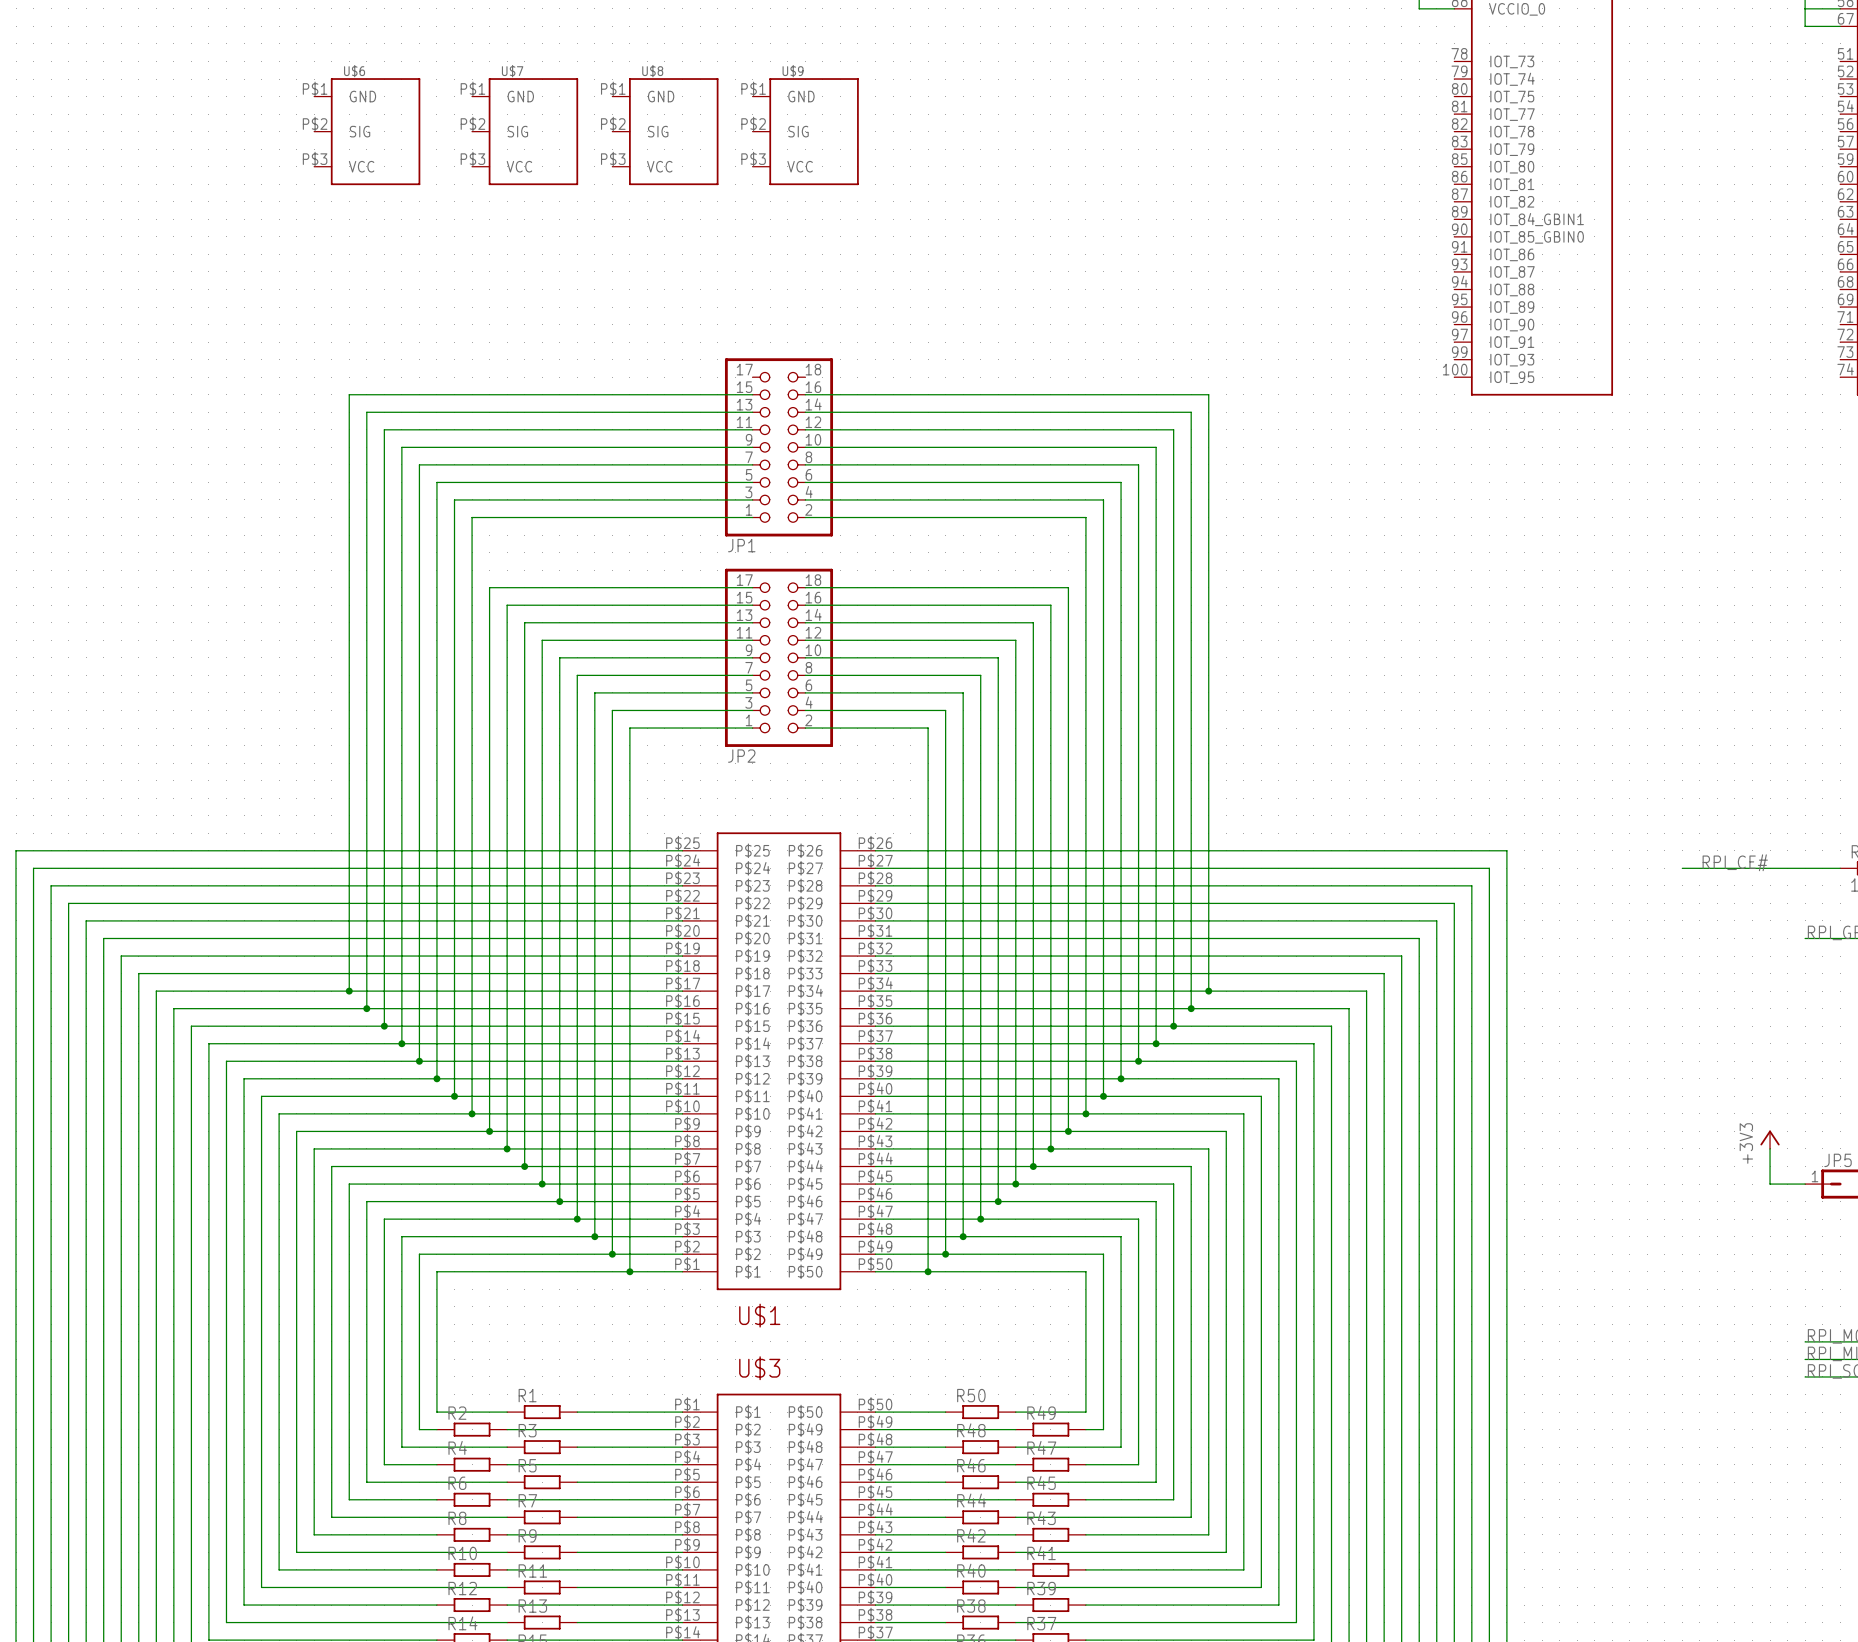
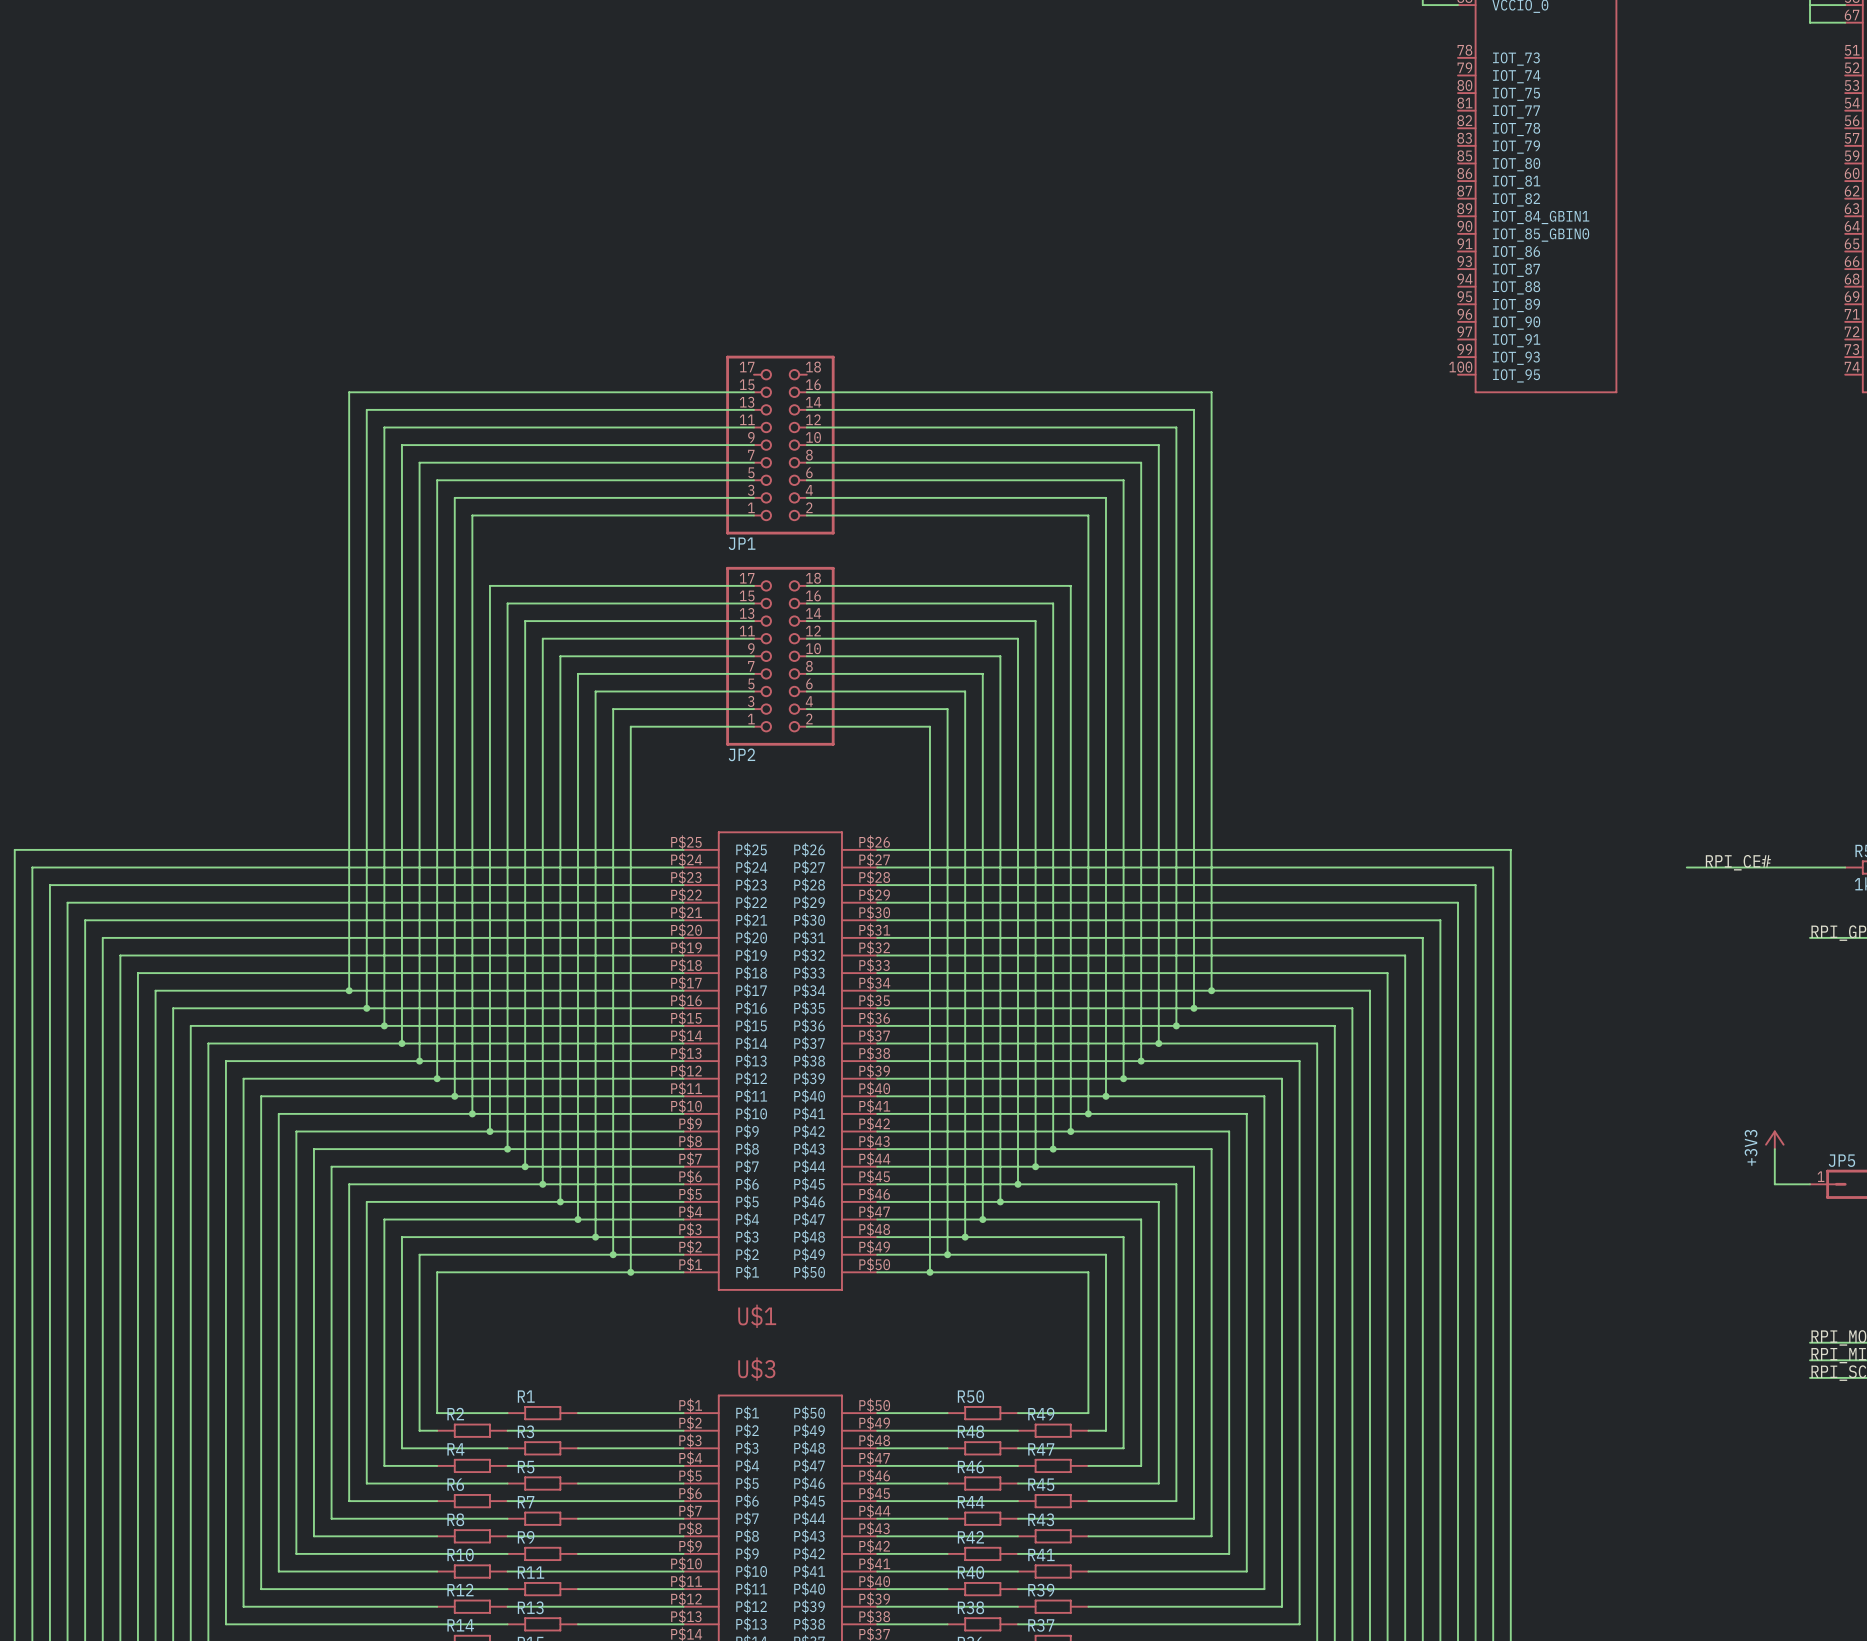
U$6: (367, 131) -> none
U$7: (525, 131) -> none
U$8: (665, 131) -> none
U$9: (805, 131) -> none

